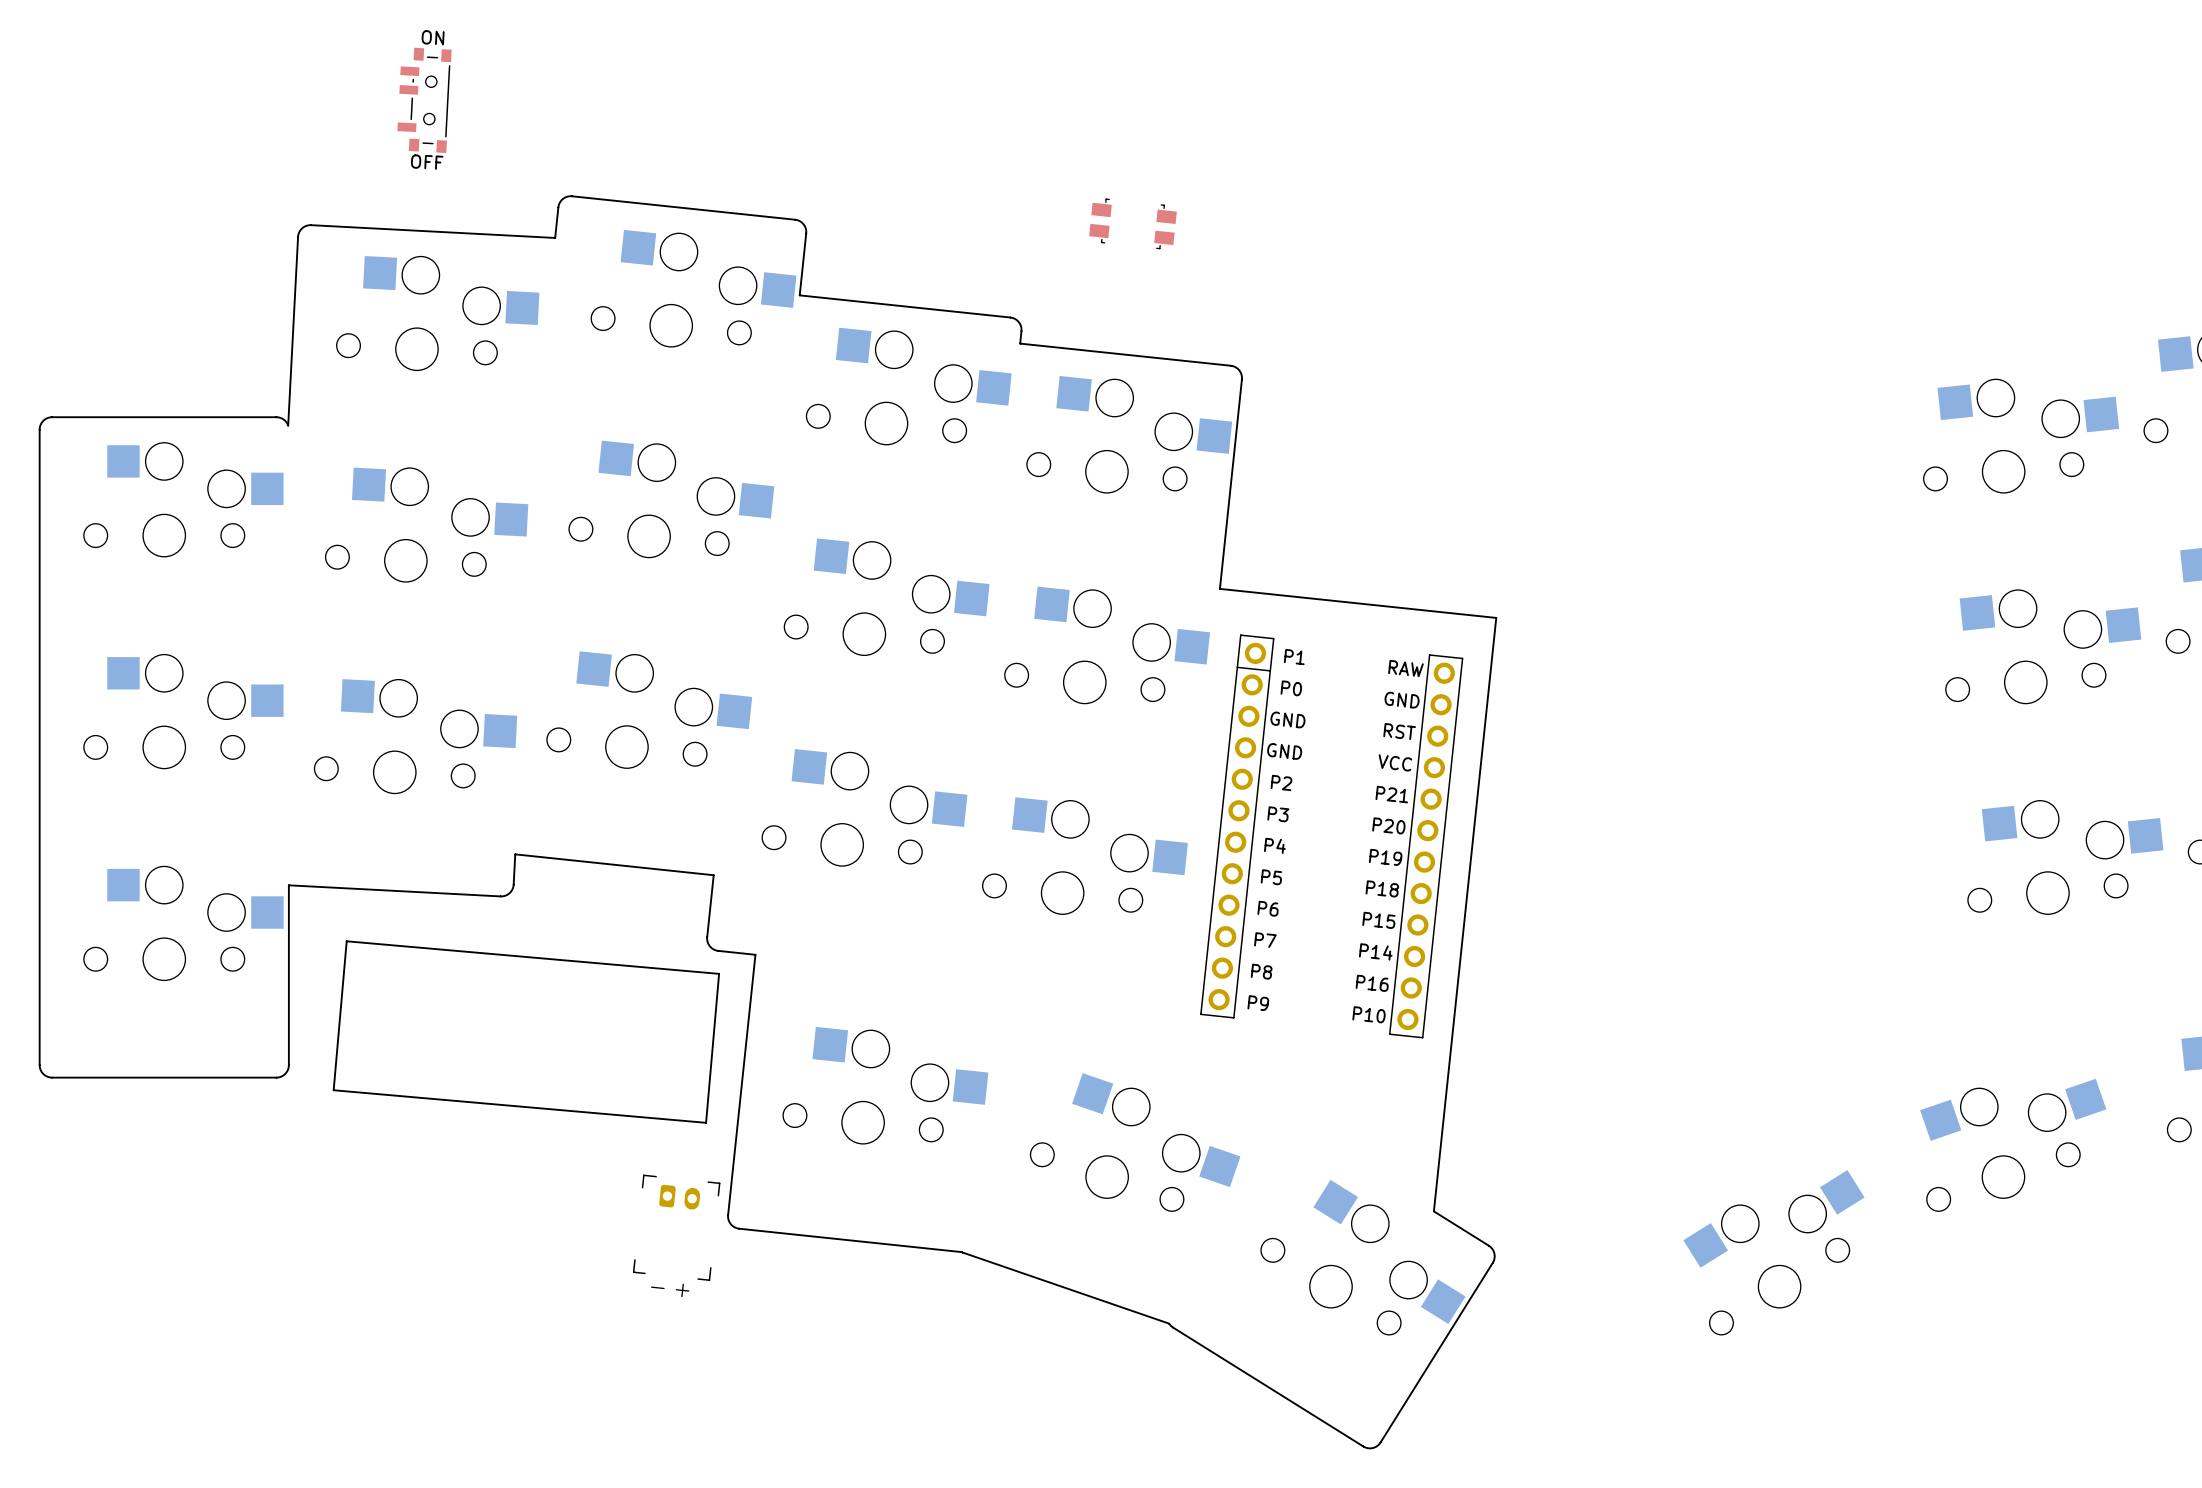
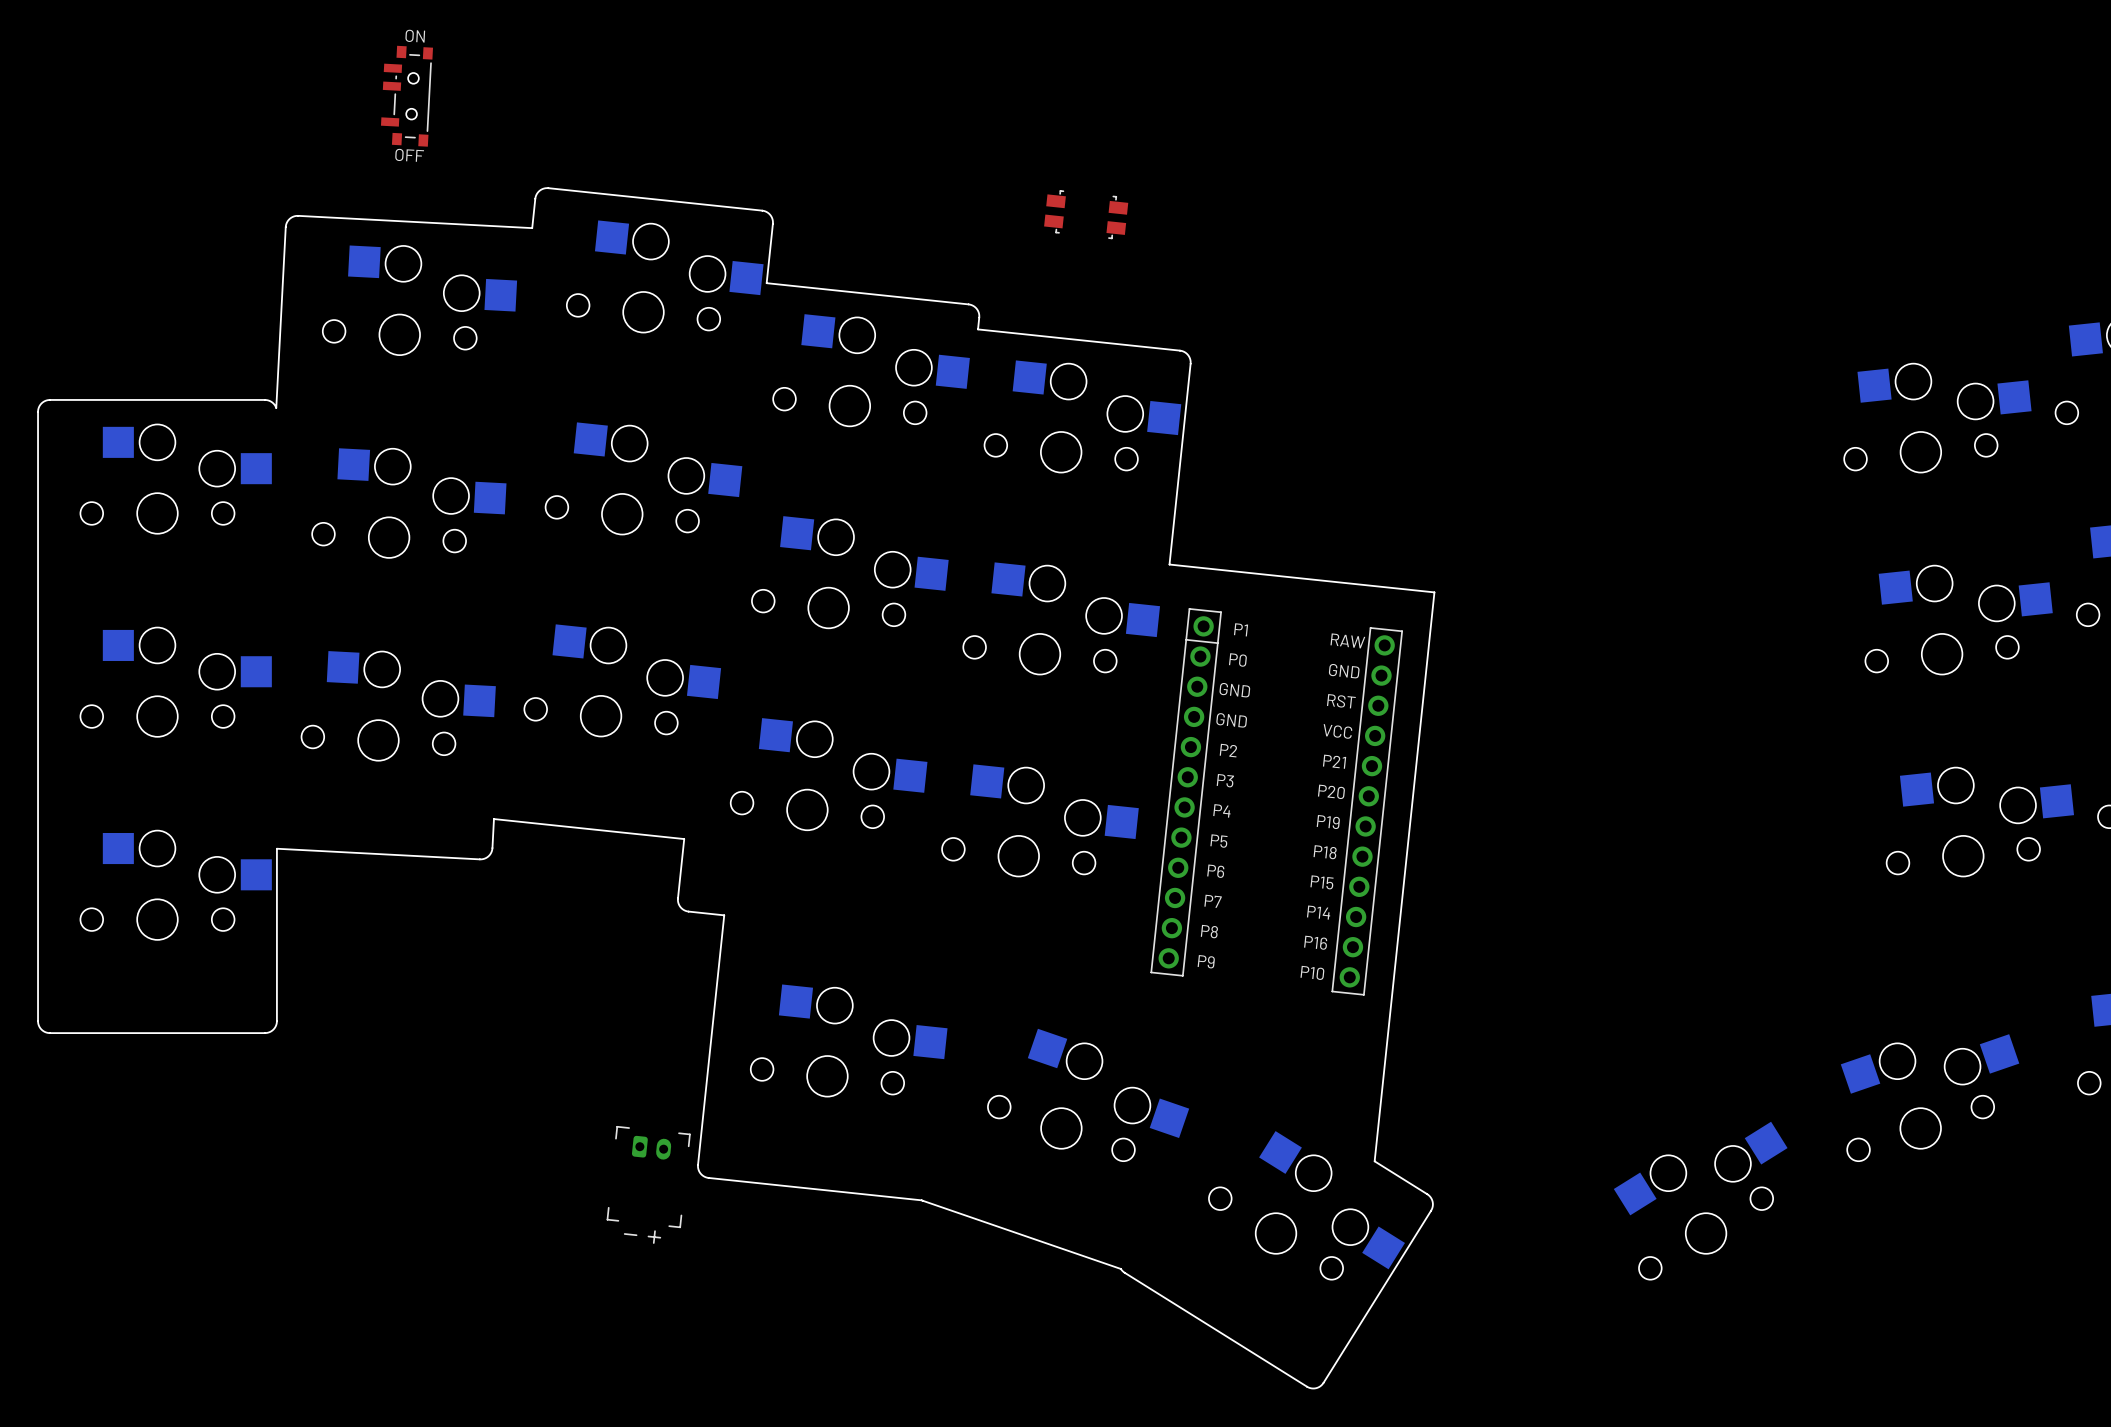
board edge: (346, 941) (333, 1090) (706, 1122) (719, 973) (346, 941) -> none

